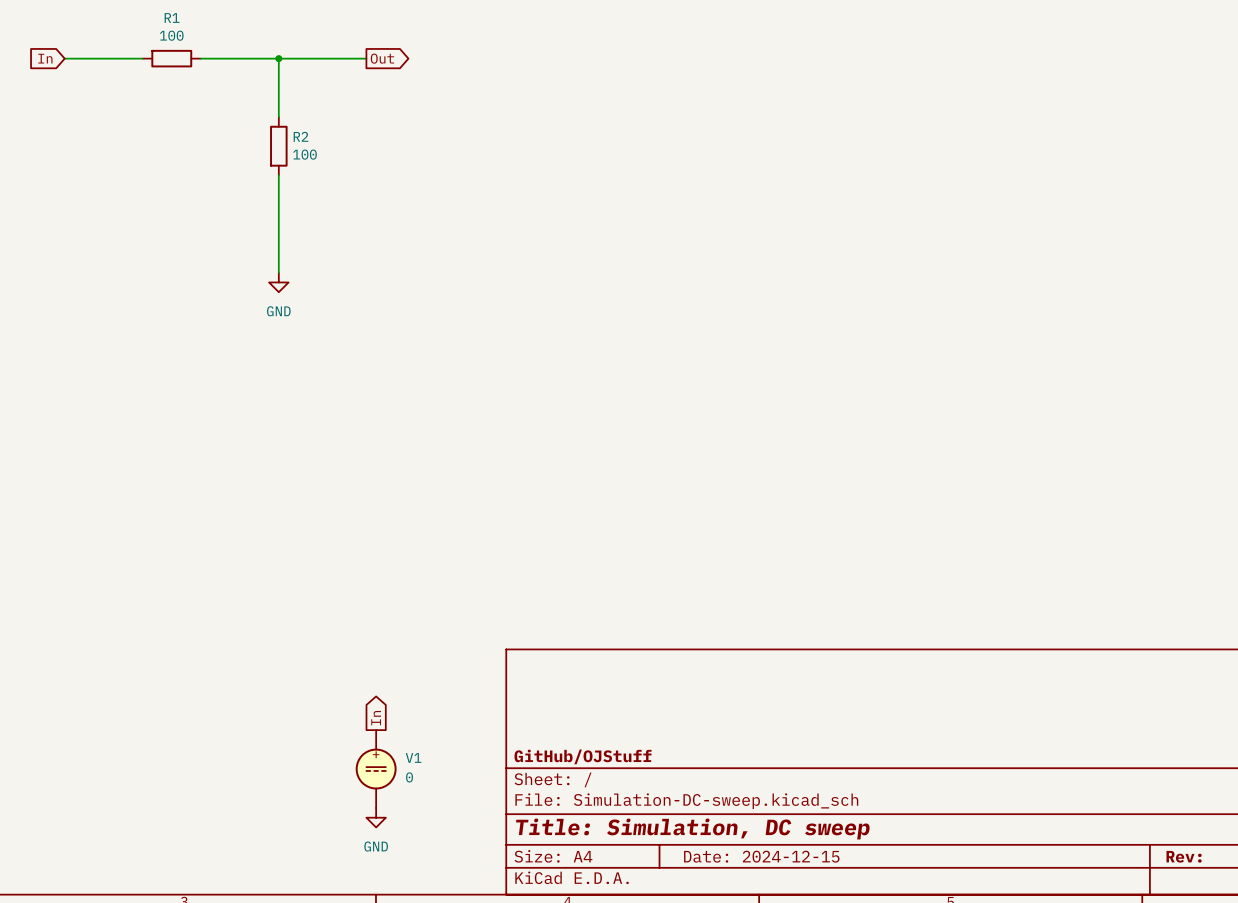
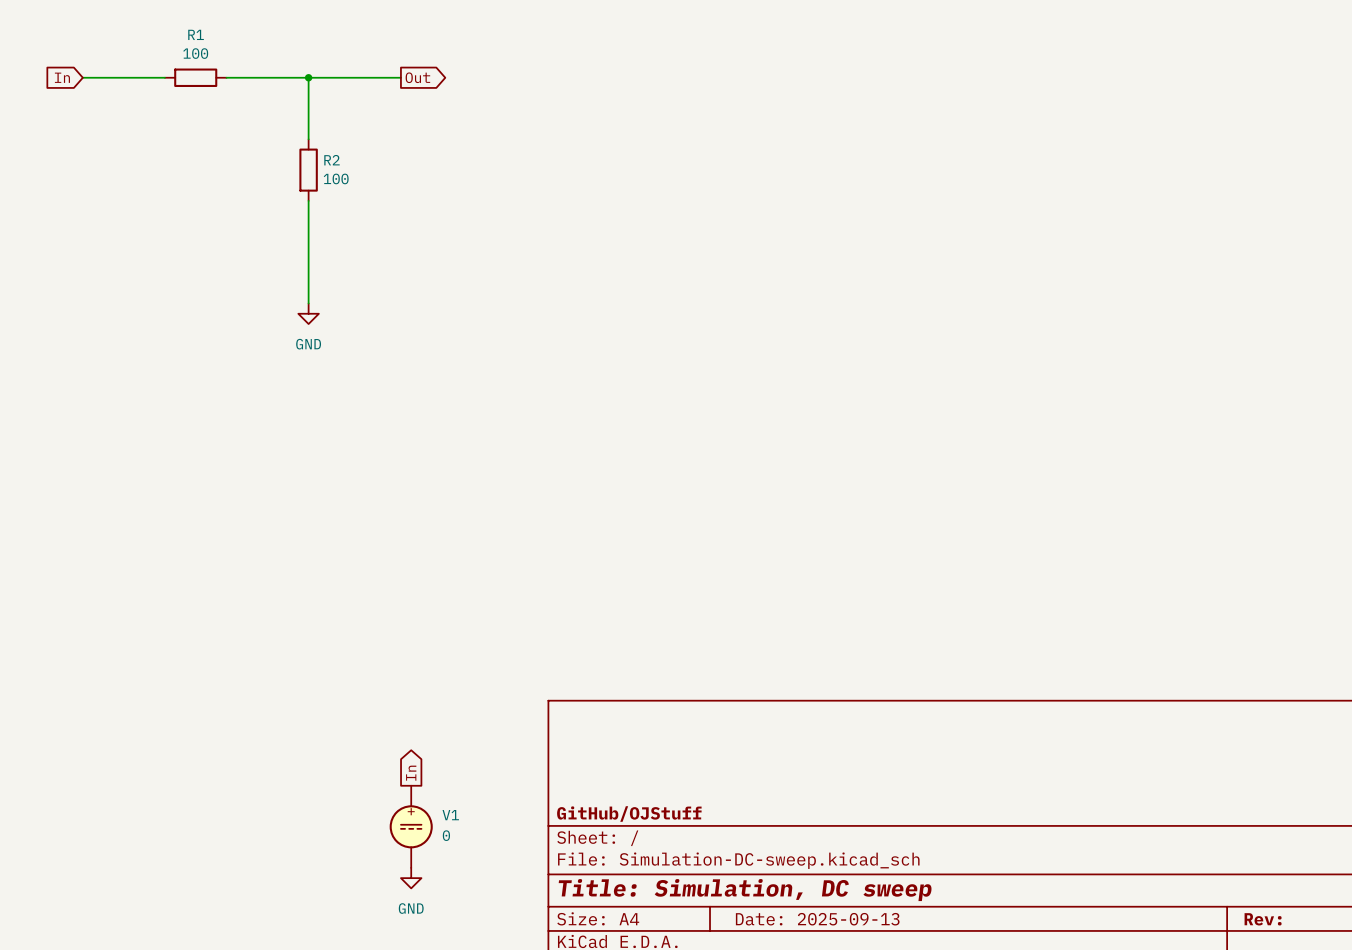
title block: Date: 2024-12-15 (761, 856) -> Date: 2025-09-13 (817, 919)

